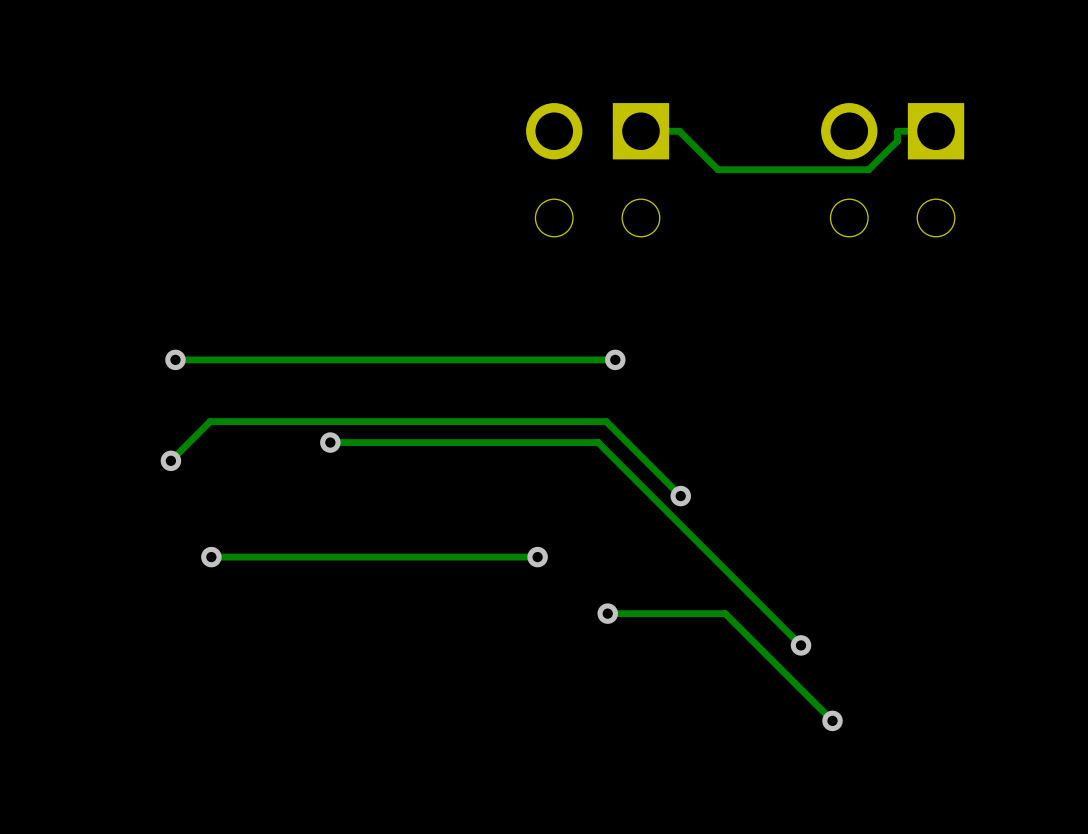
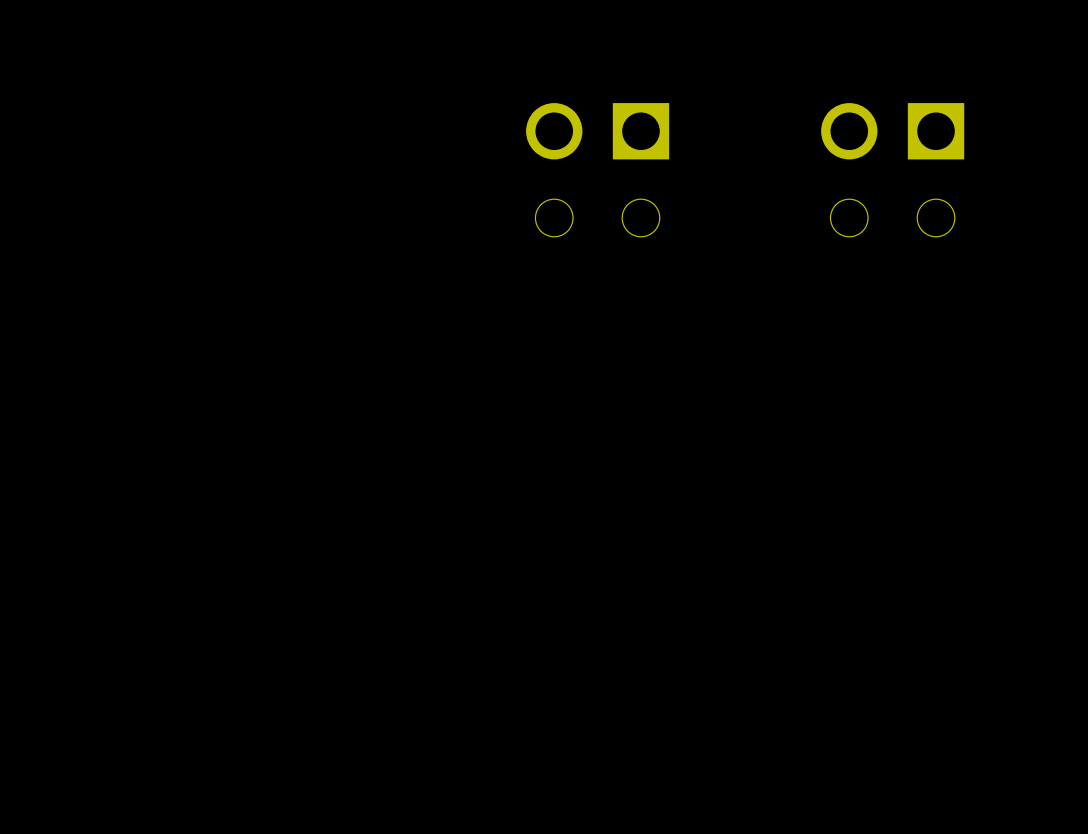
track: (936, 131) (897, 131) (897, 140) (868, 169) (717, 169) (679, 131) (640, 131) -> none
via: (175, 359) -> none
track: (615, 359) (175, 359) -> none
via: (615, 359) -> none
track: (330, 442) (598, 442) (801, 645) -> none
via: (330, 442) -> none
track: (170, 460) (210, 421) (606, 421) (680, 496) -> none
via: (170, 460) -> none
via: (680, 496) -> none
via: (211, 557) -> none
track: (537, 557) (211, 557) -> none
via: (537, 557) -> none
track: (607, 613) (725, 613) (832, 720) -> none
via: (607, 613) -> none
via: (801, 645) -> none
via: (832, 720) -> none

